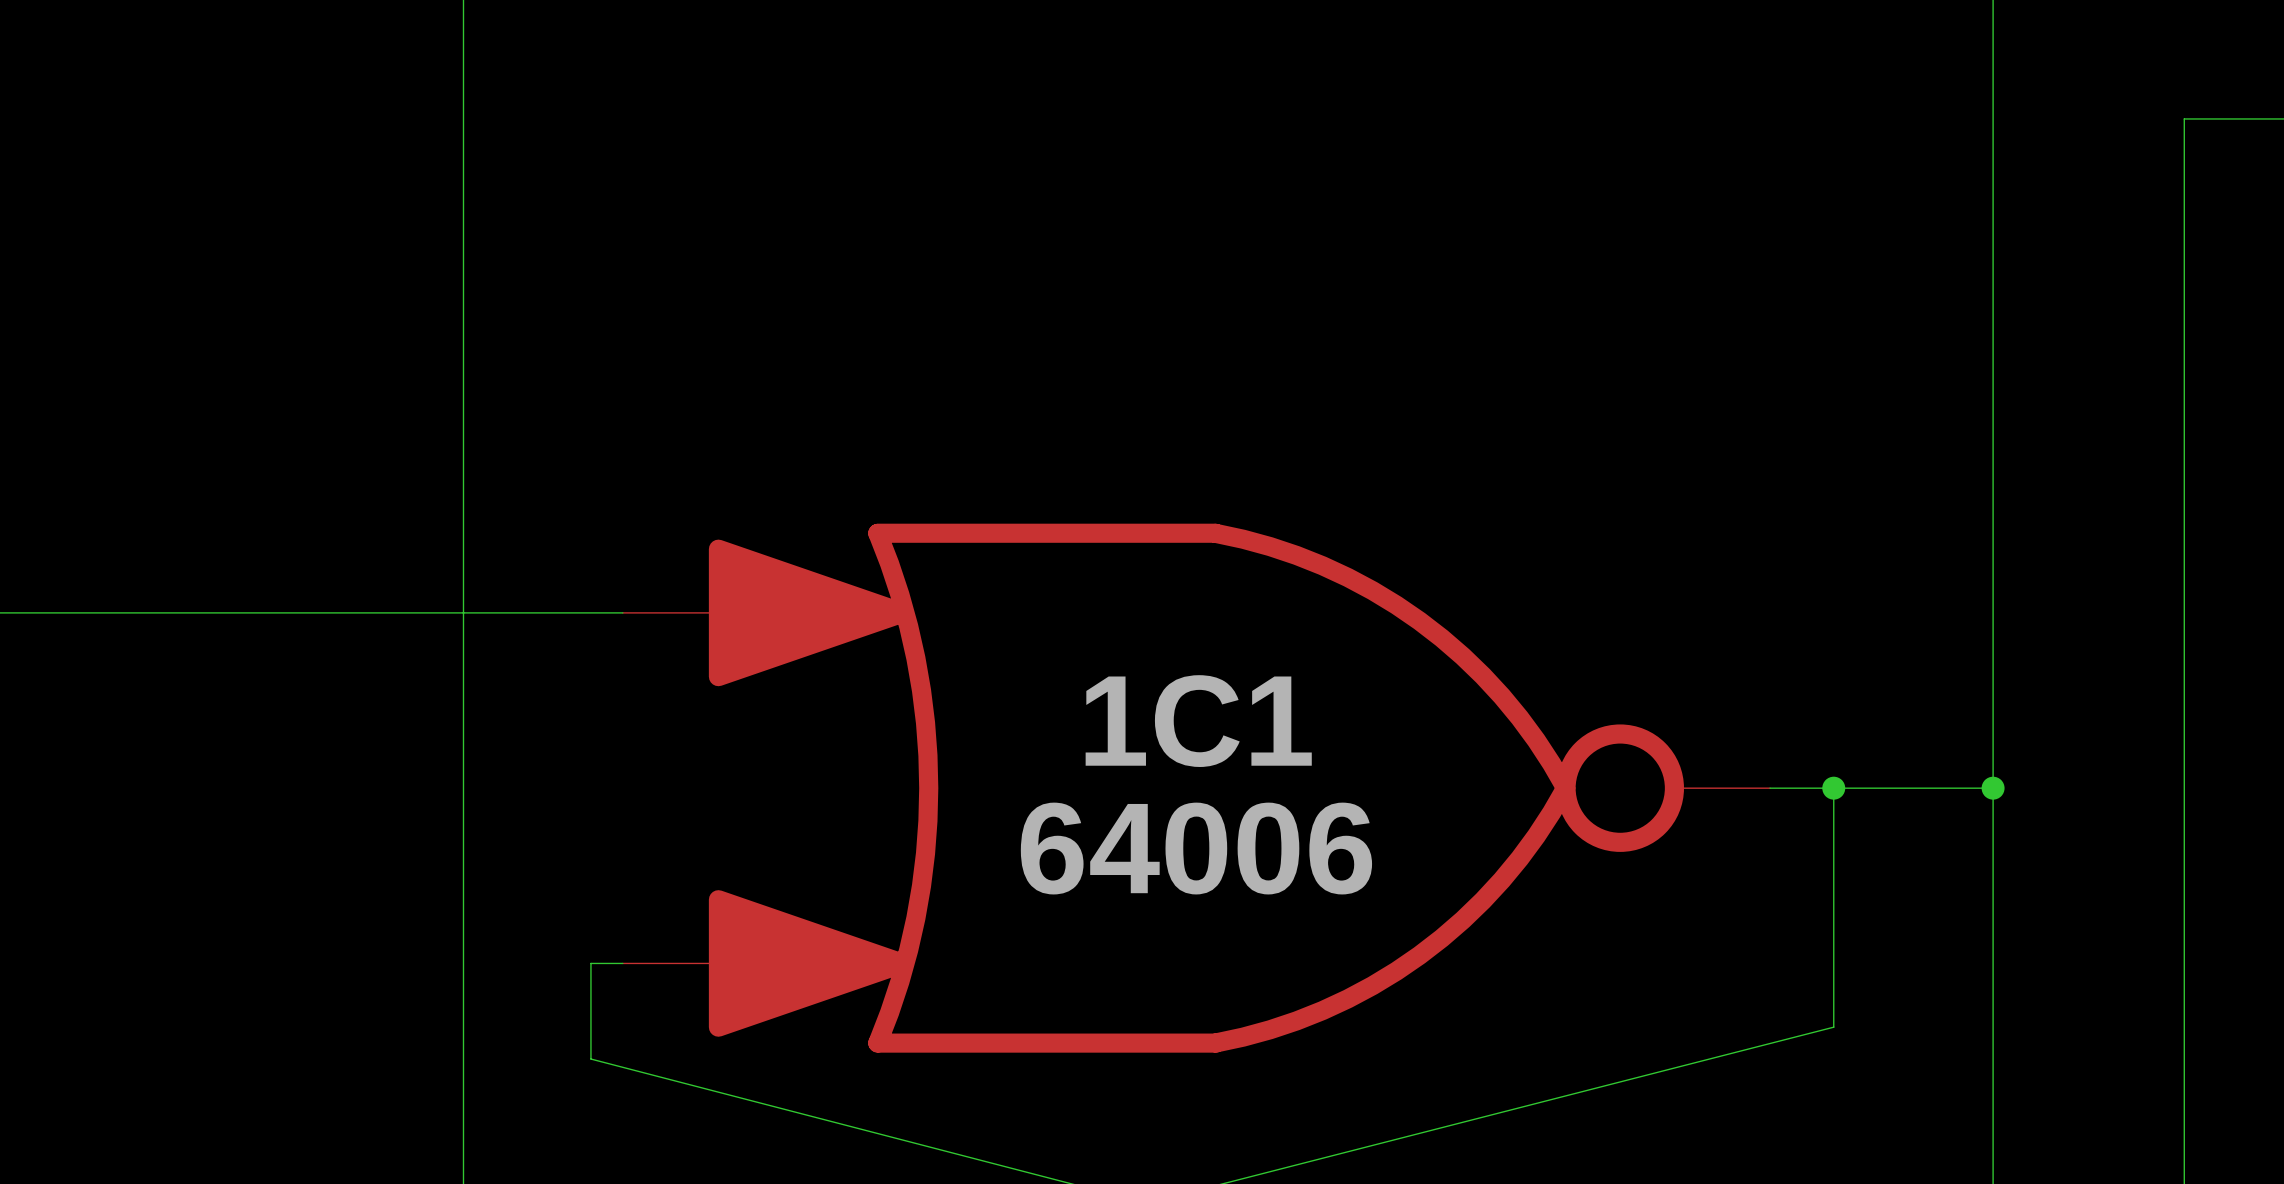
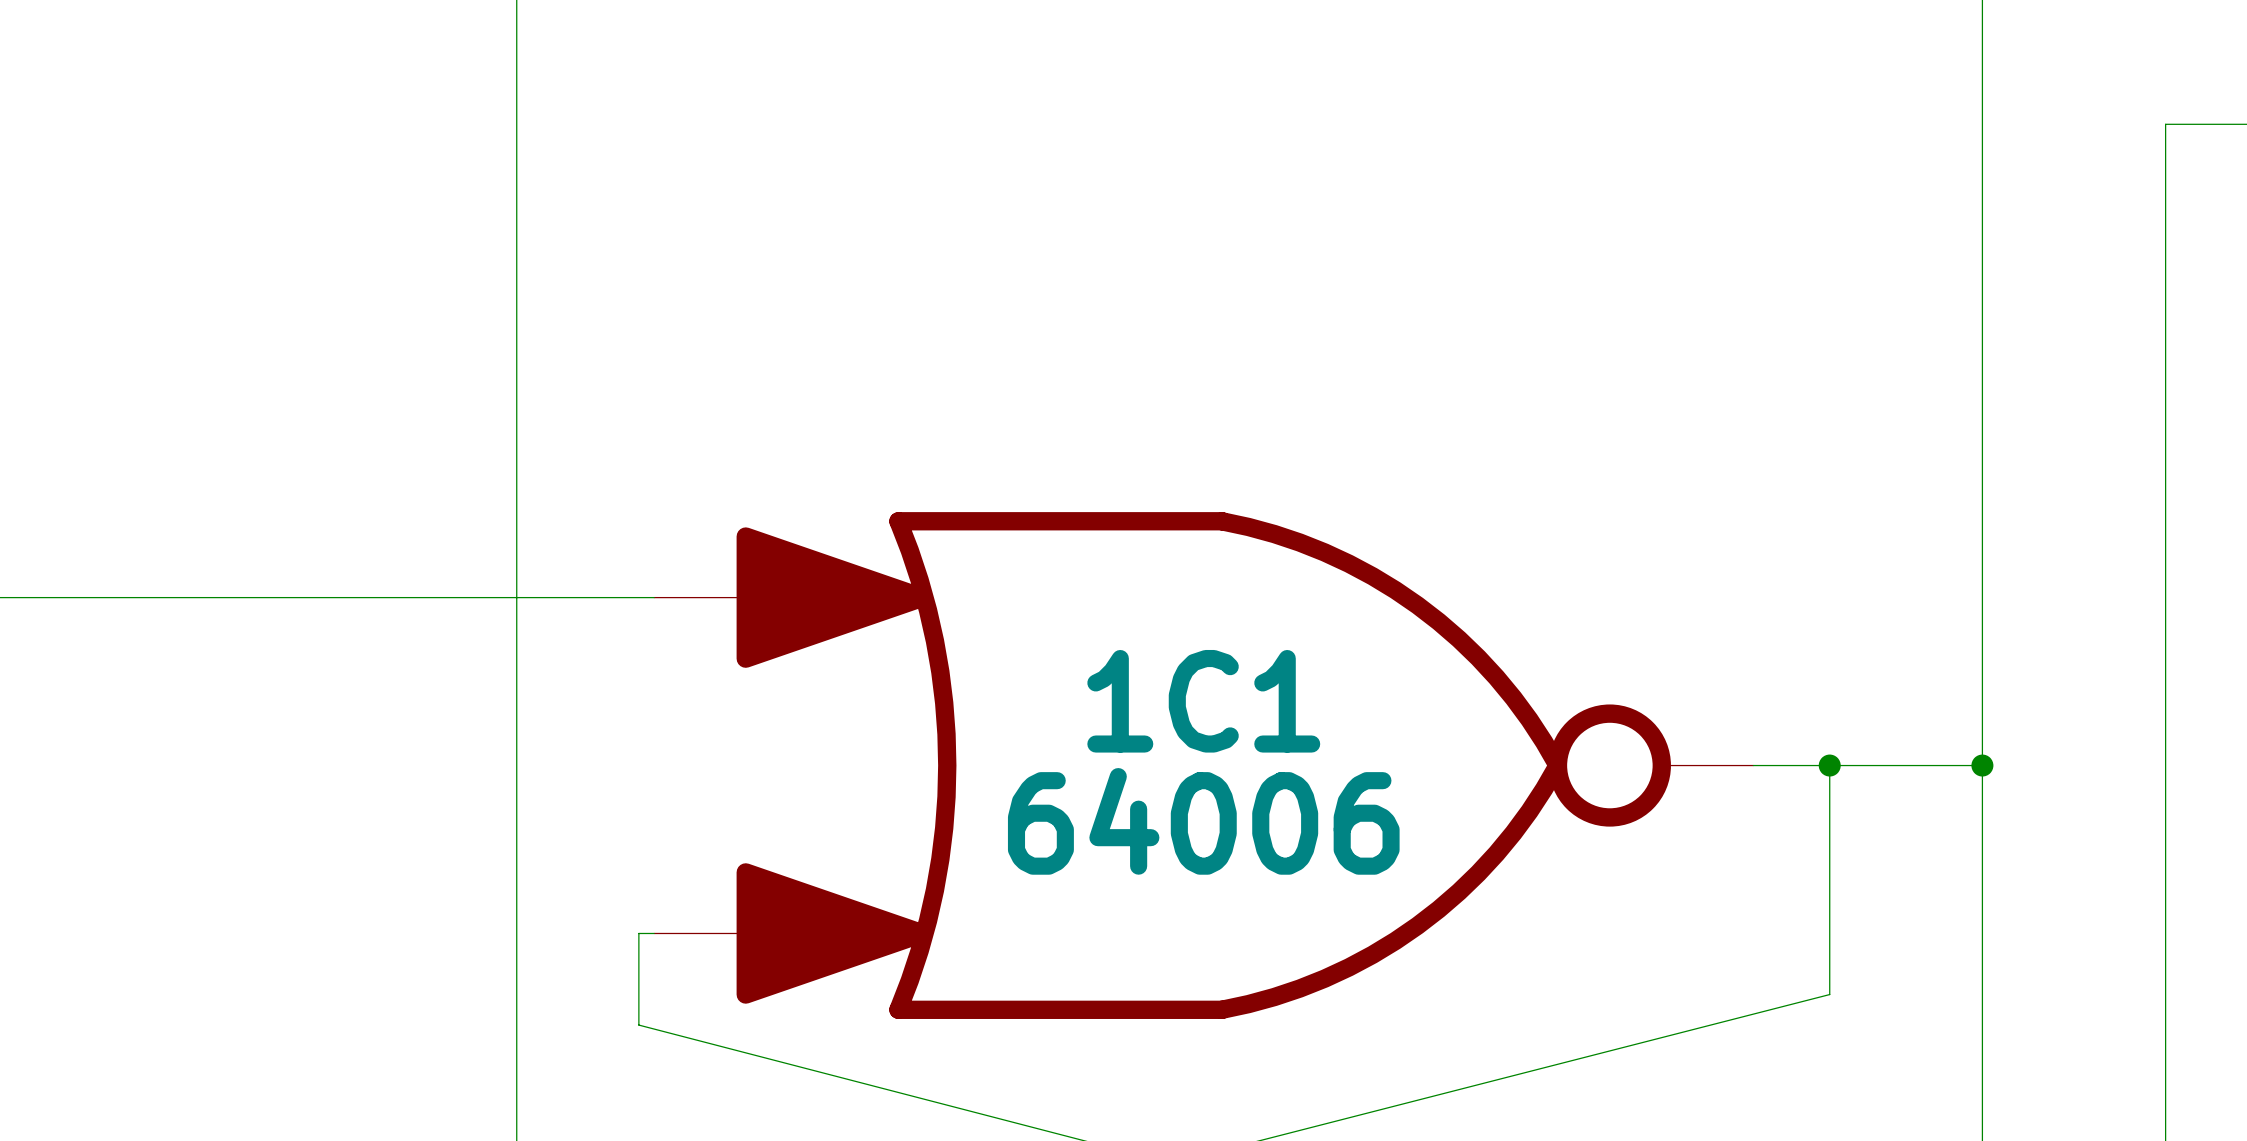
part position: (1196, 788) -> (1203, 765)

